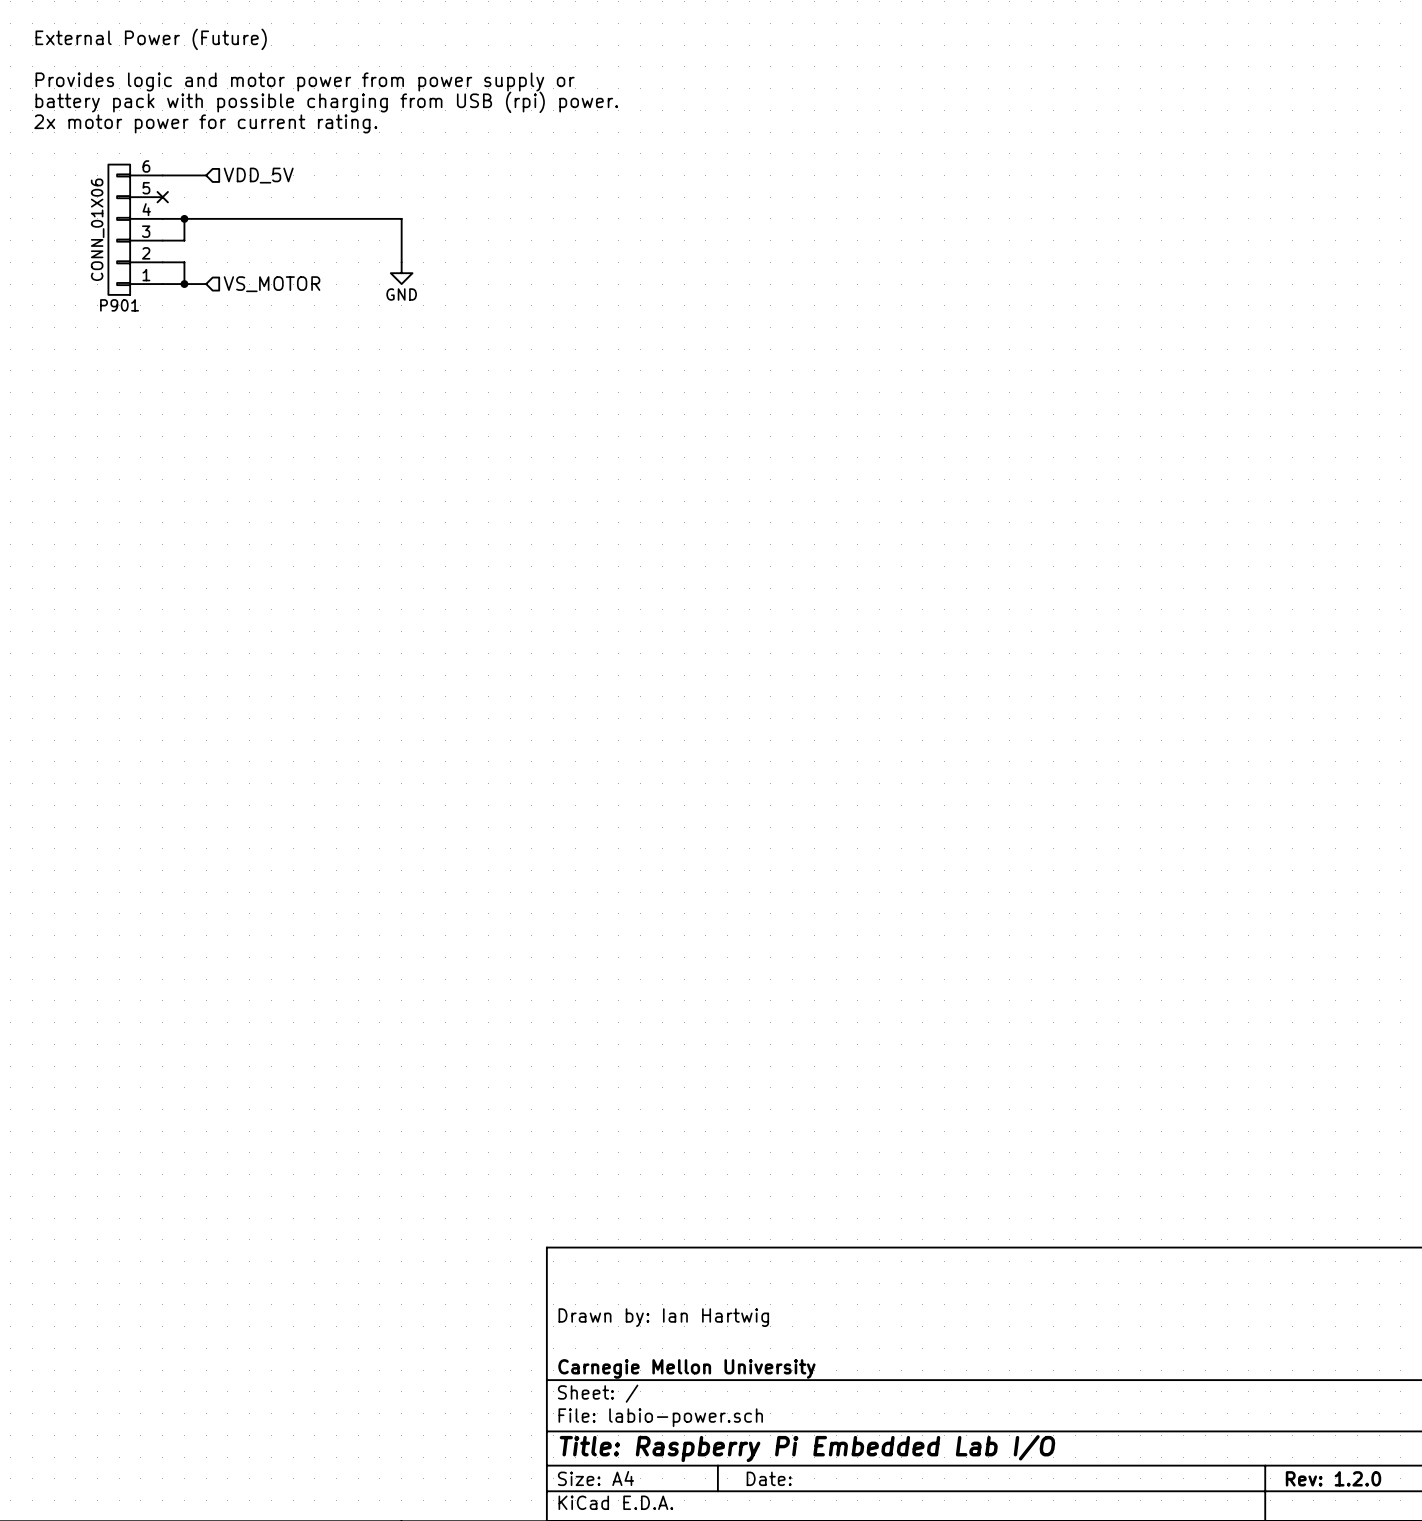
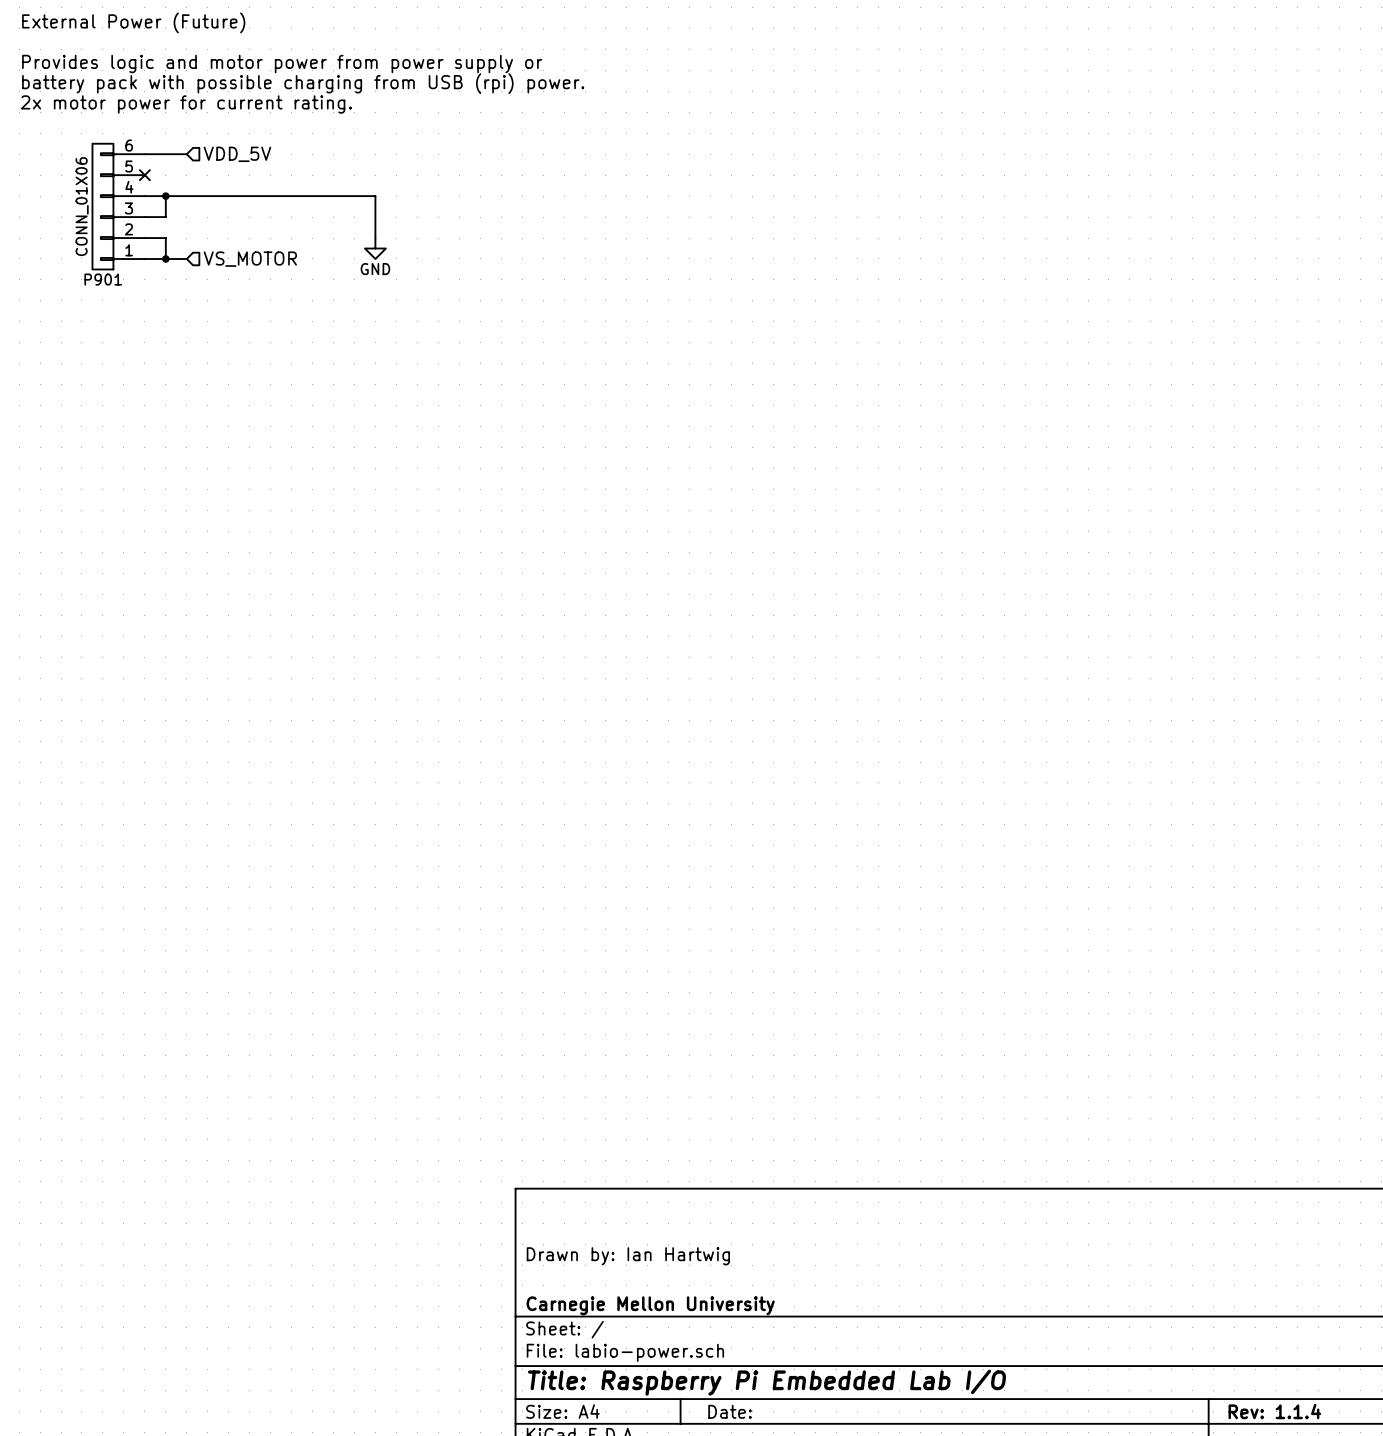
title block: Rev: 1.2.0 (1333, 1478) -> Rev: 1.1.4 (1274, 1411)

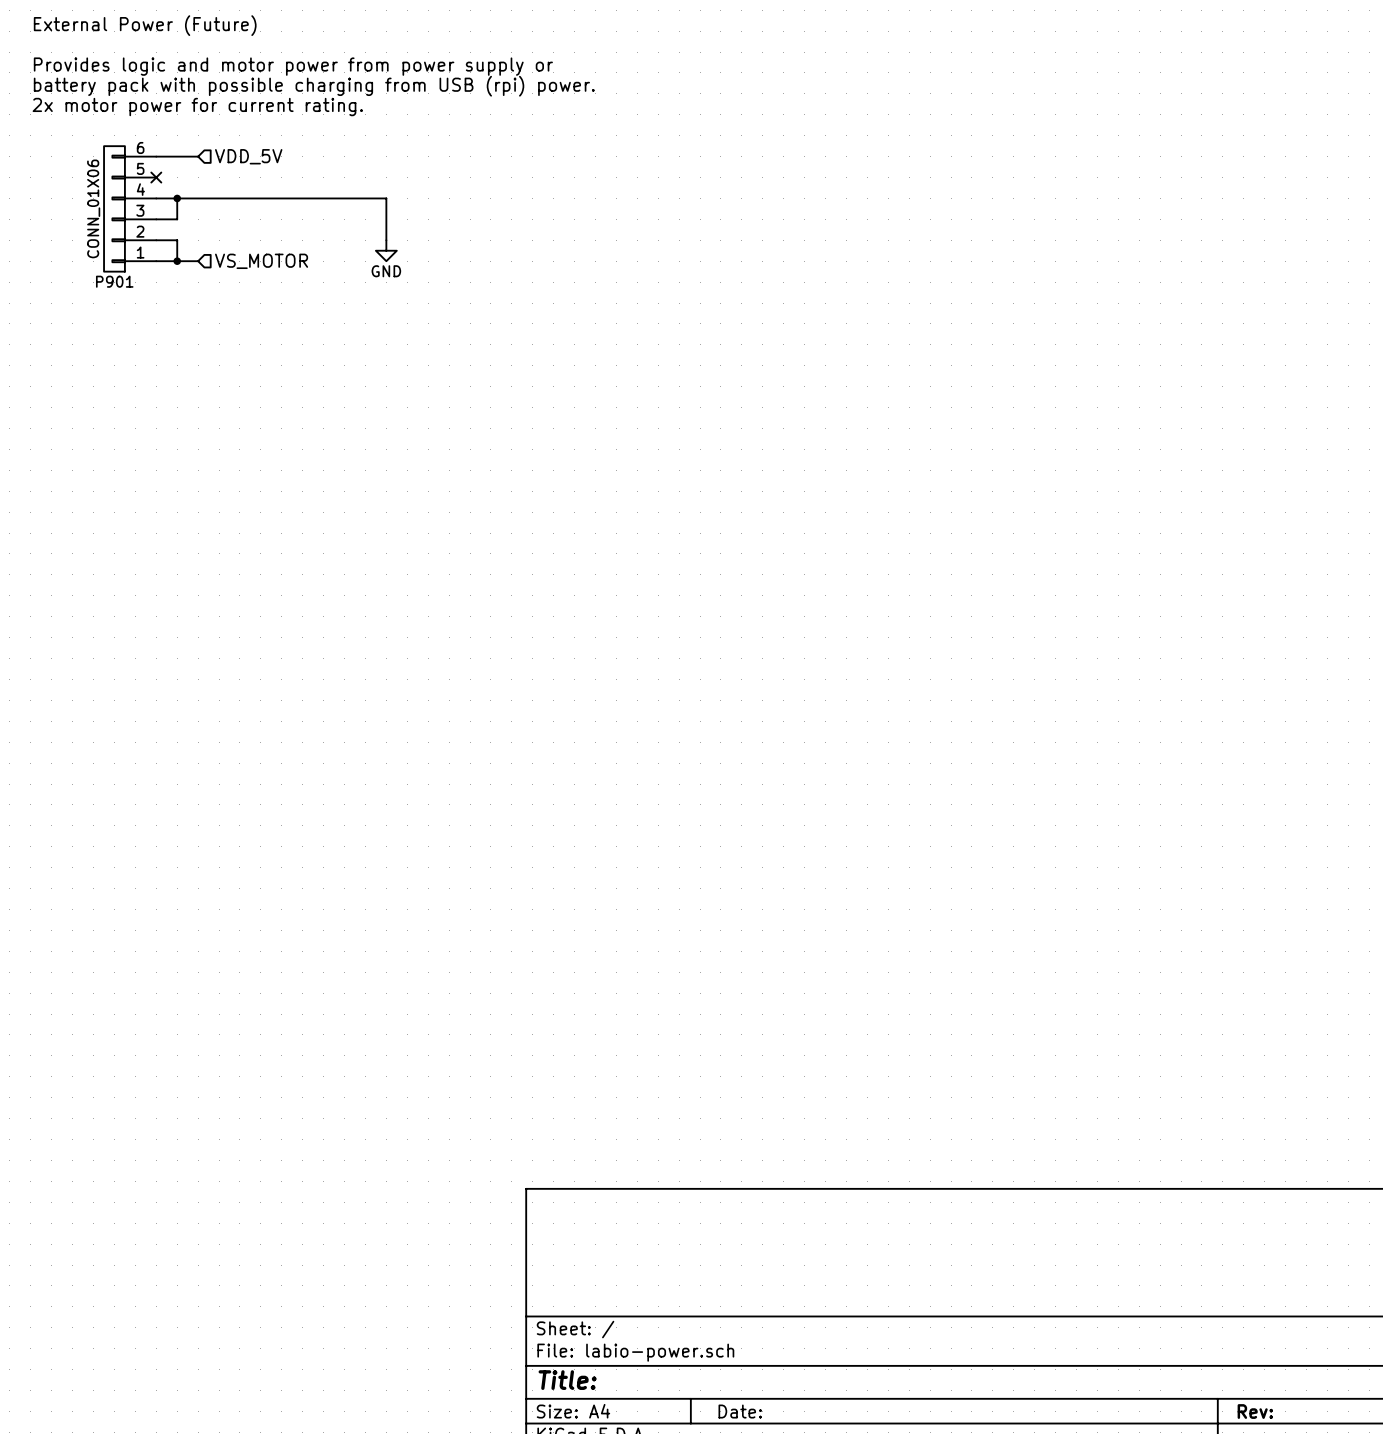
title block: Drawn by: Ian Hartwig (628, 1256) -> none
title block: Carnegie Mellon University (650, 1305) -> none
title block: Title: Raspberry Pi Embedded Lab I/O (766, 1382) -> Title: (567, 1380)
title block: Rev: 1.1.4 (1274, 1411) -> Rev: (1255, 1411)

